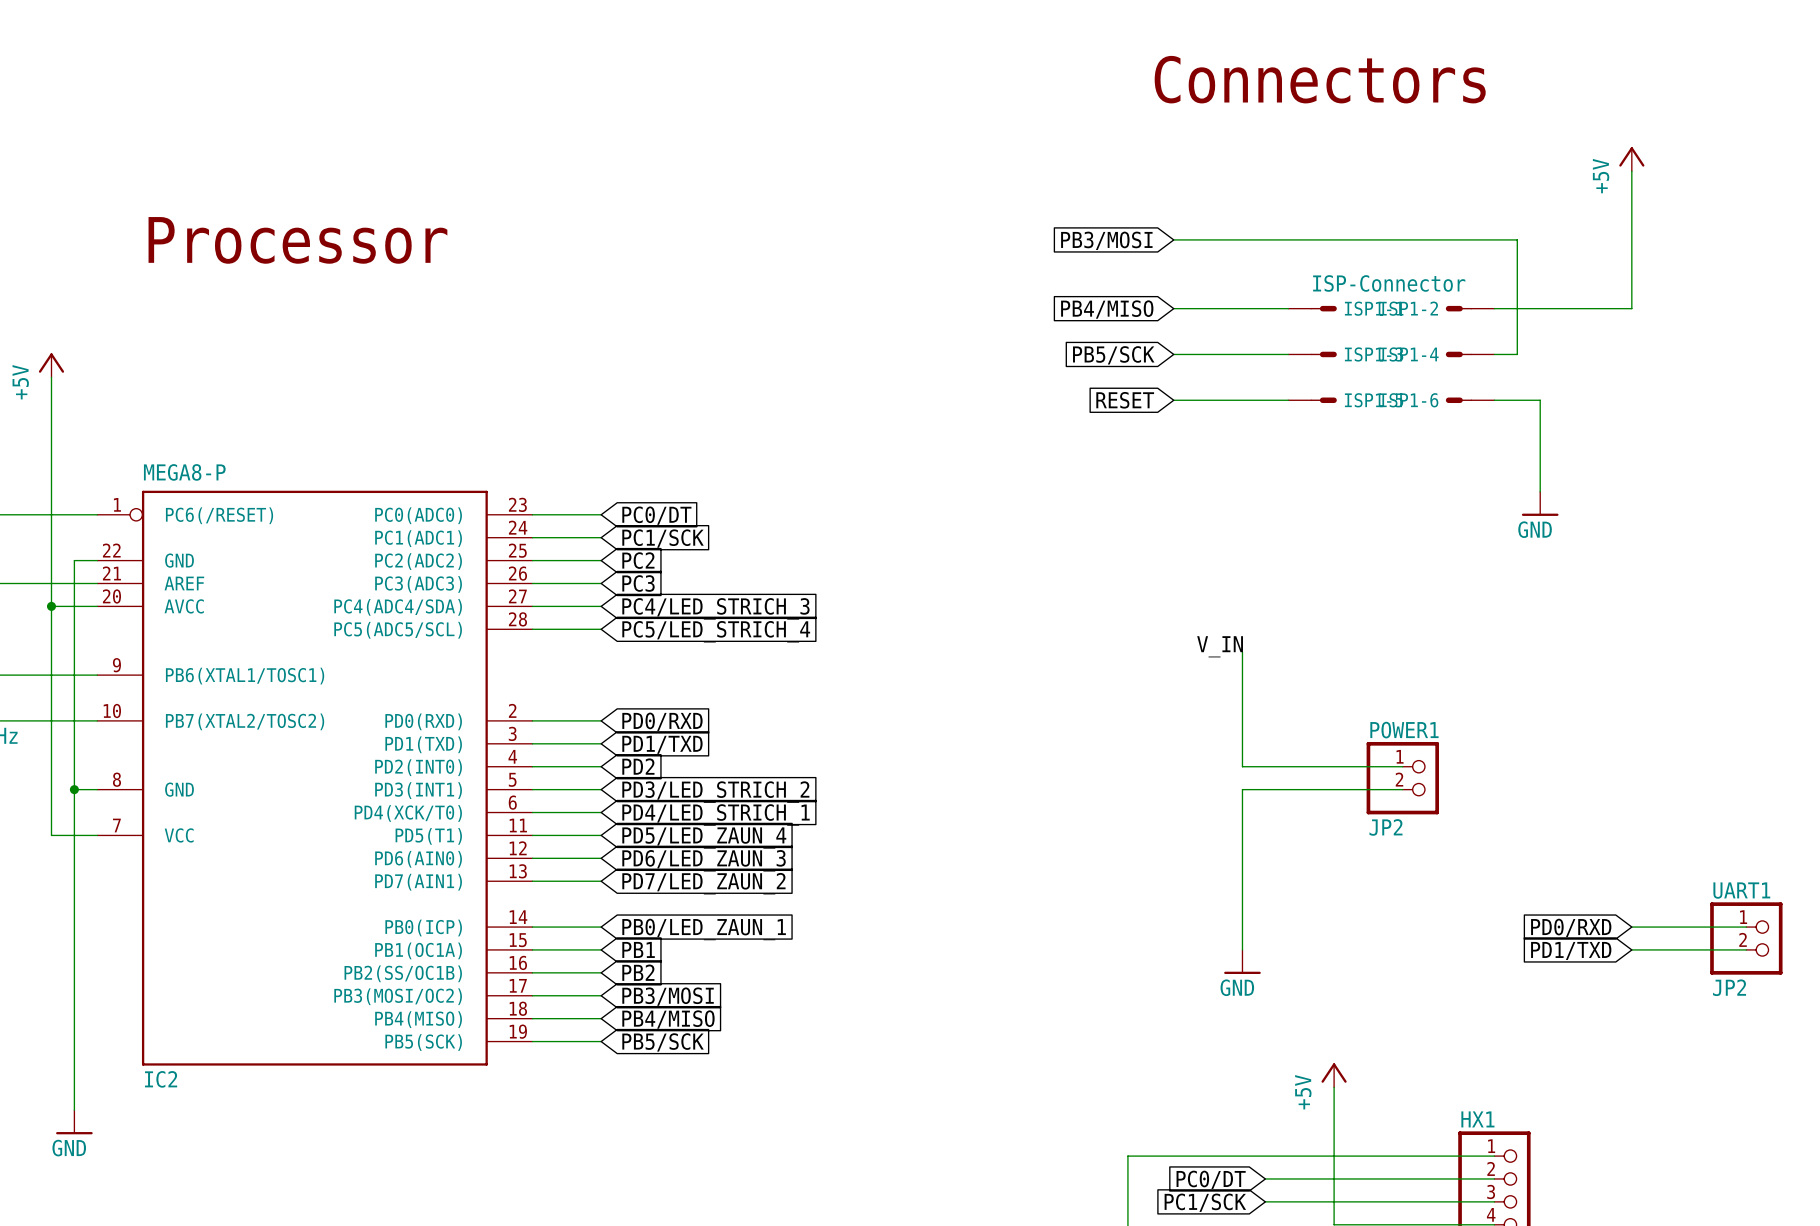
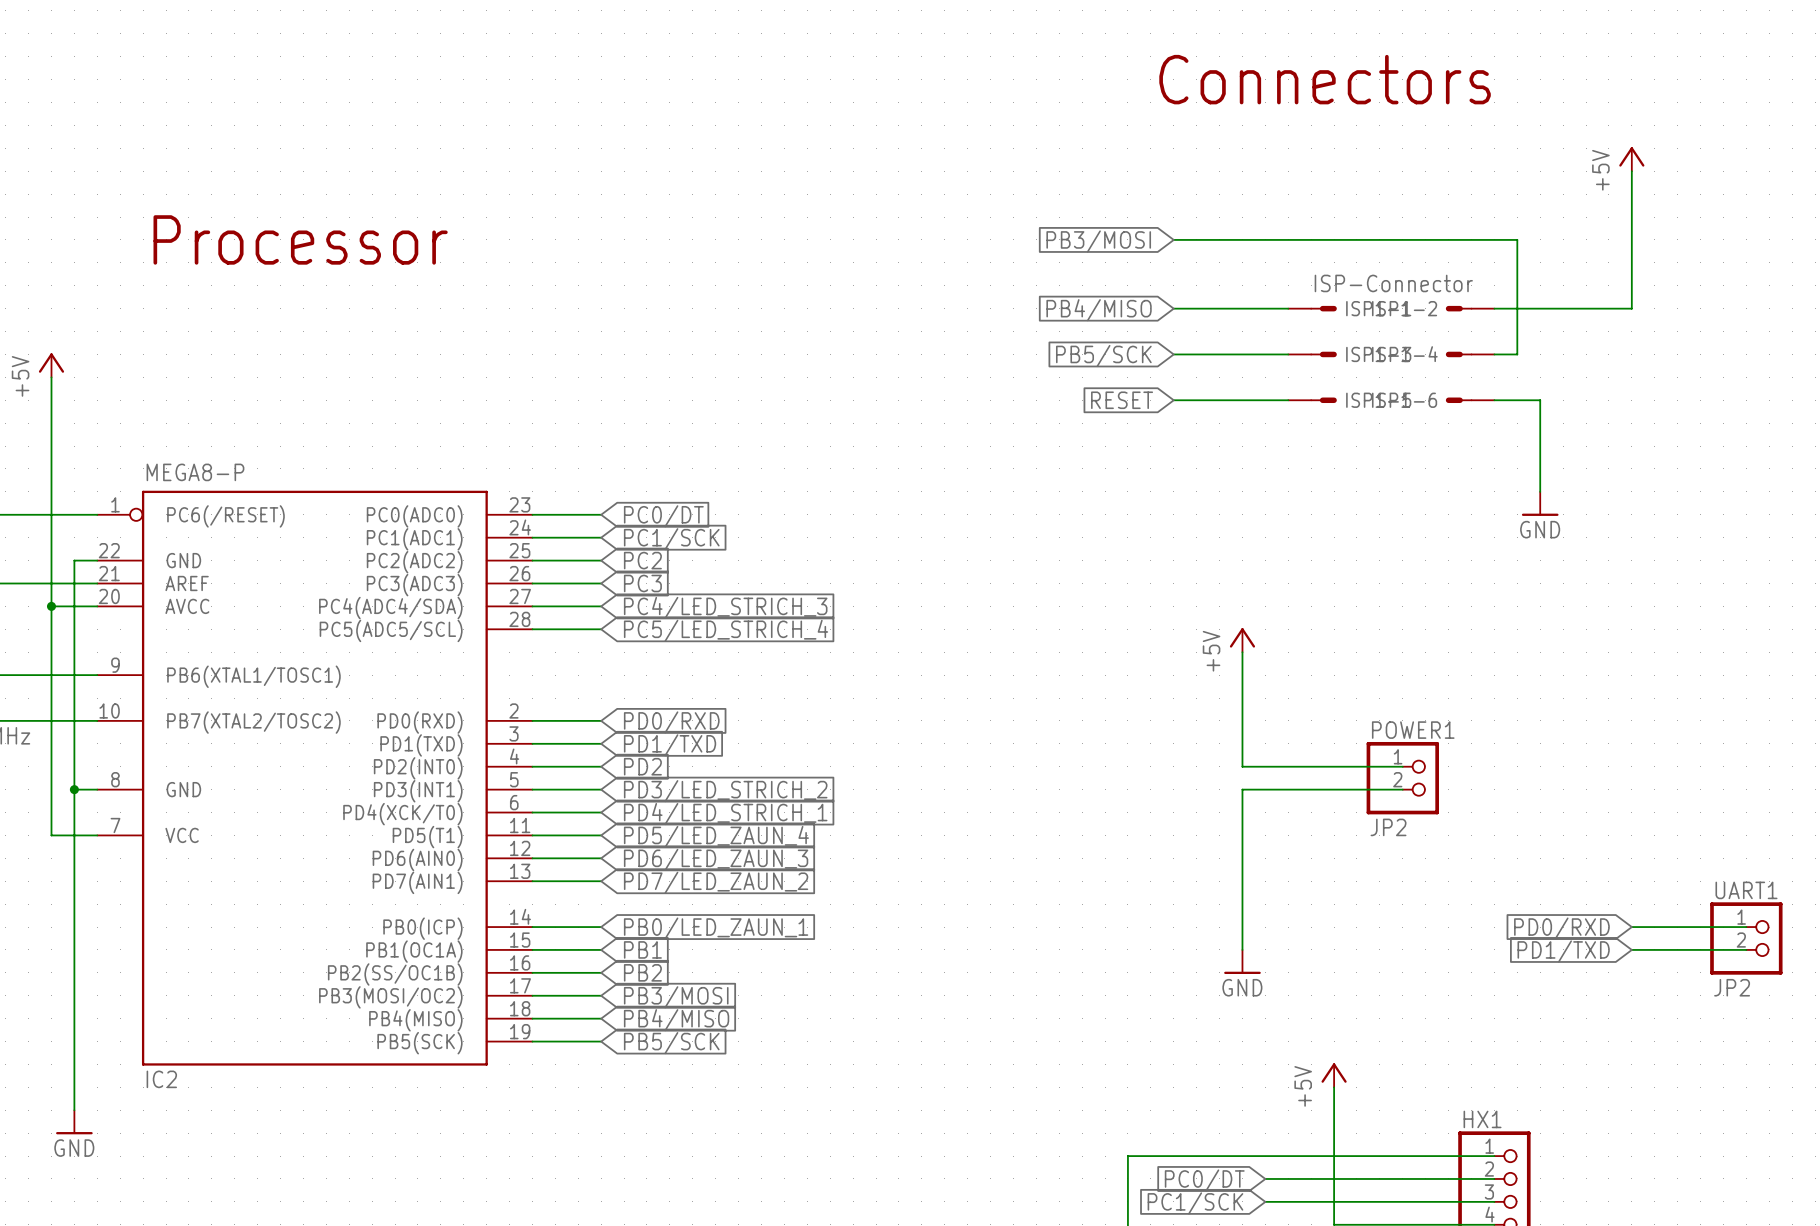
power symbol: none -> +5V (1242, 640)
label: V_IN (1220, 646) -> none

